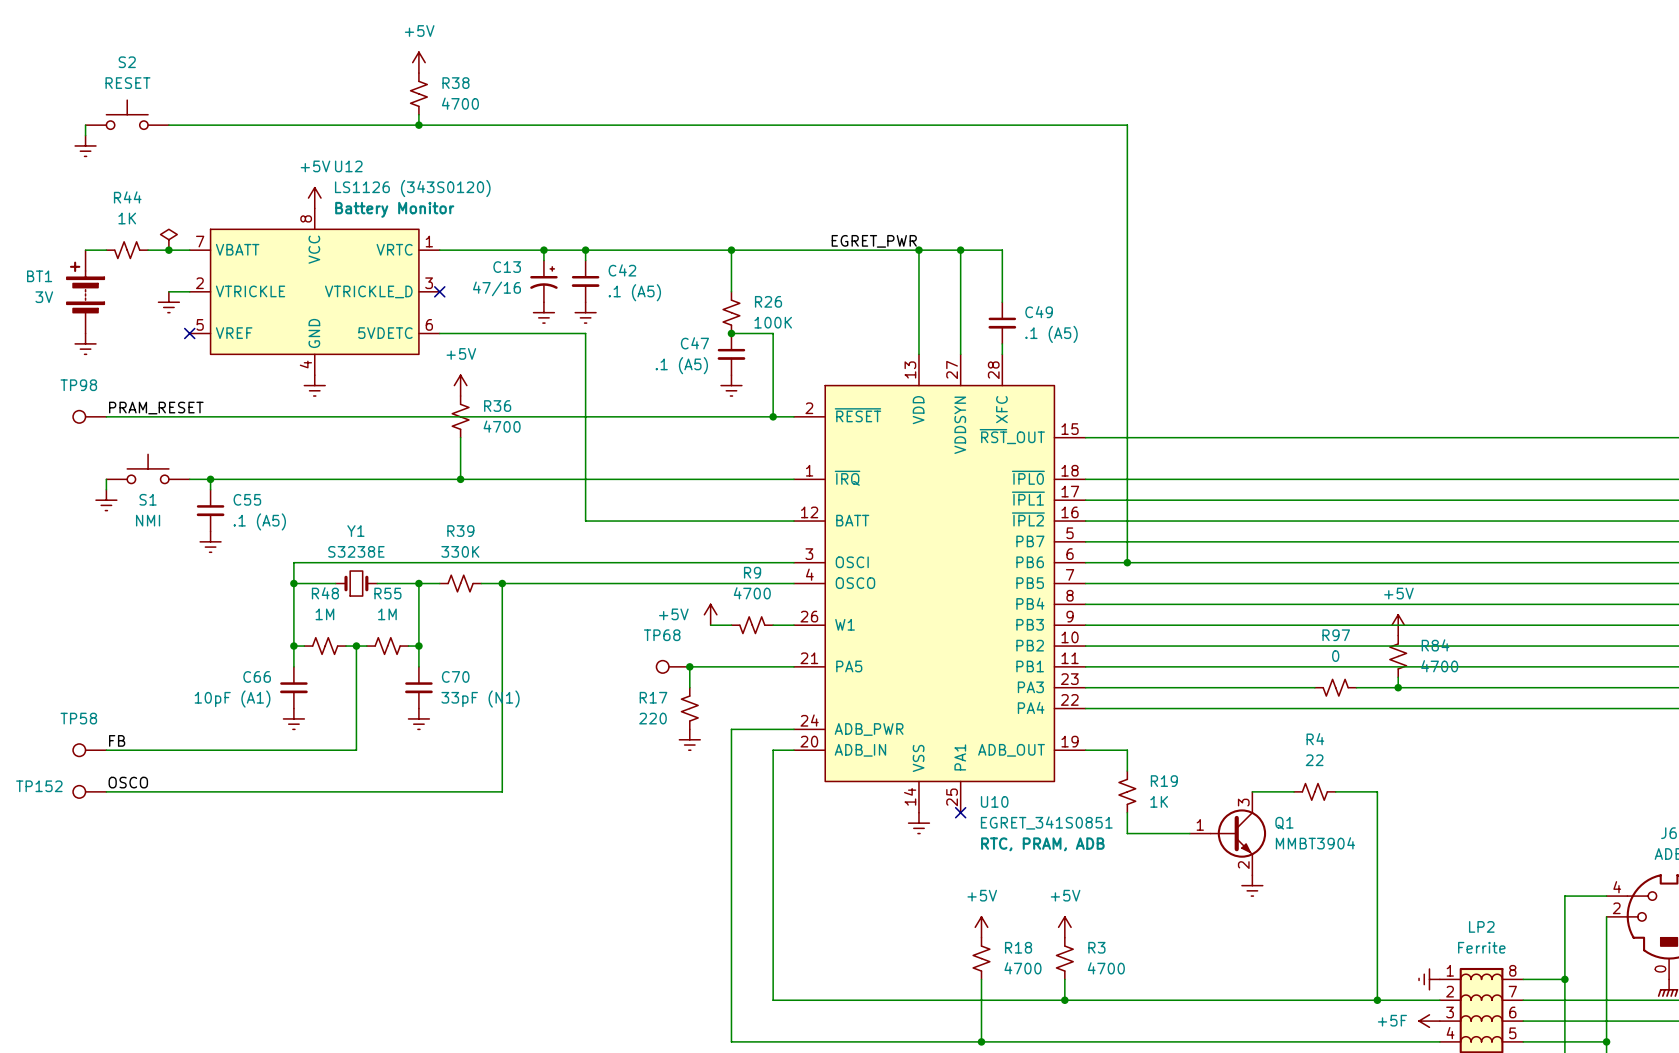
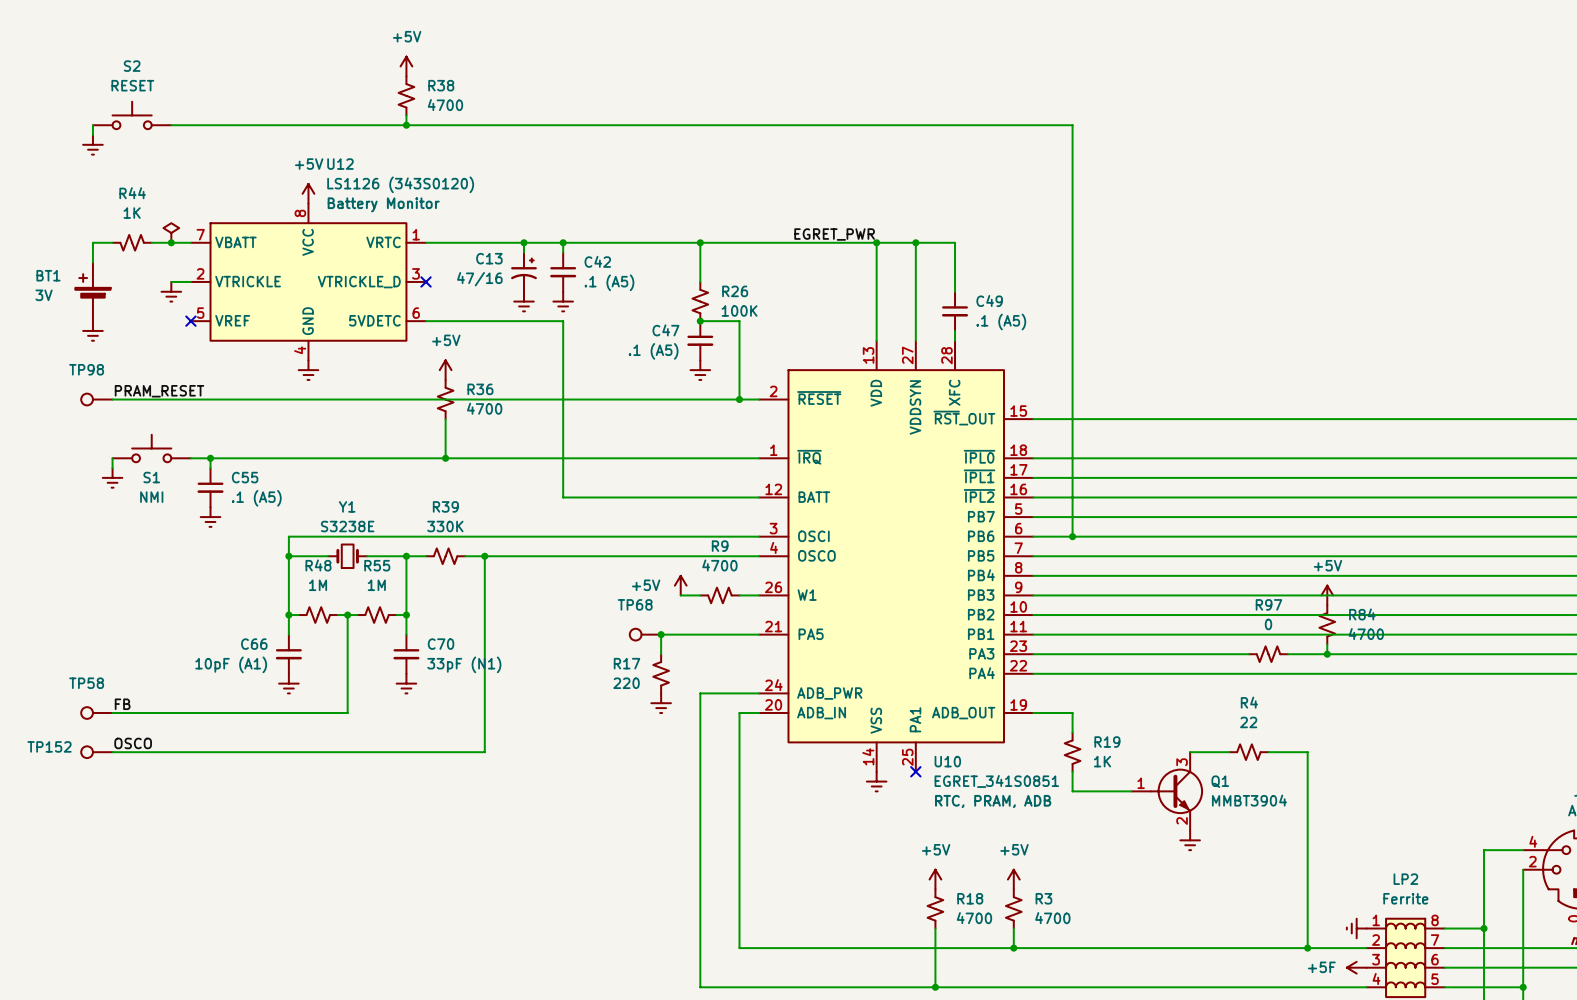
BT1 symbol: [66, 250, 105, 334] -> [75, 262, 111, 322]

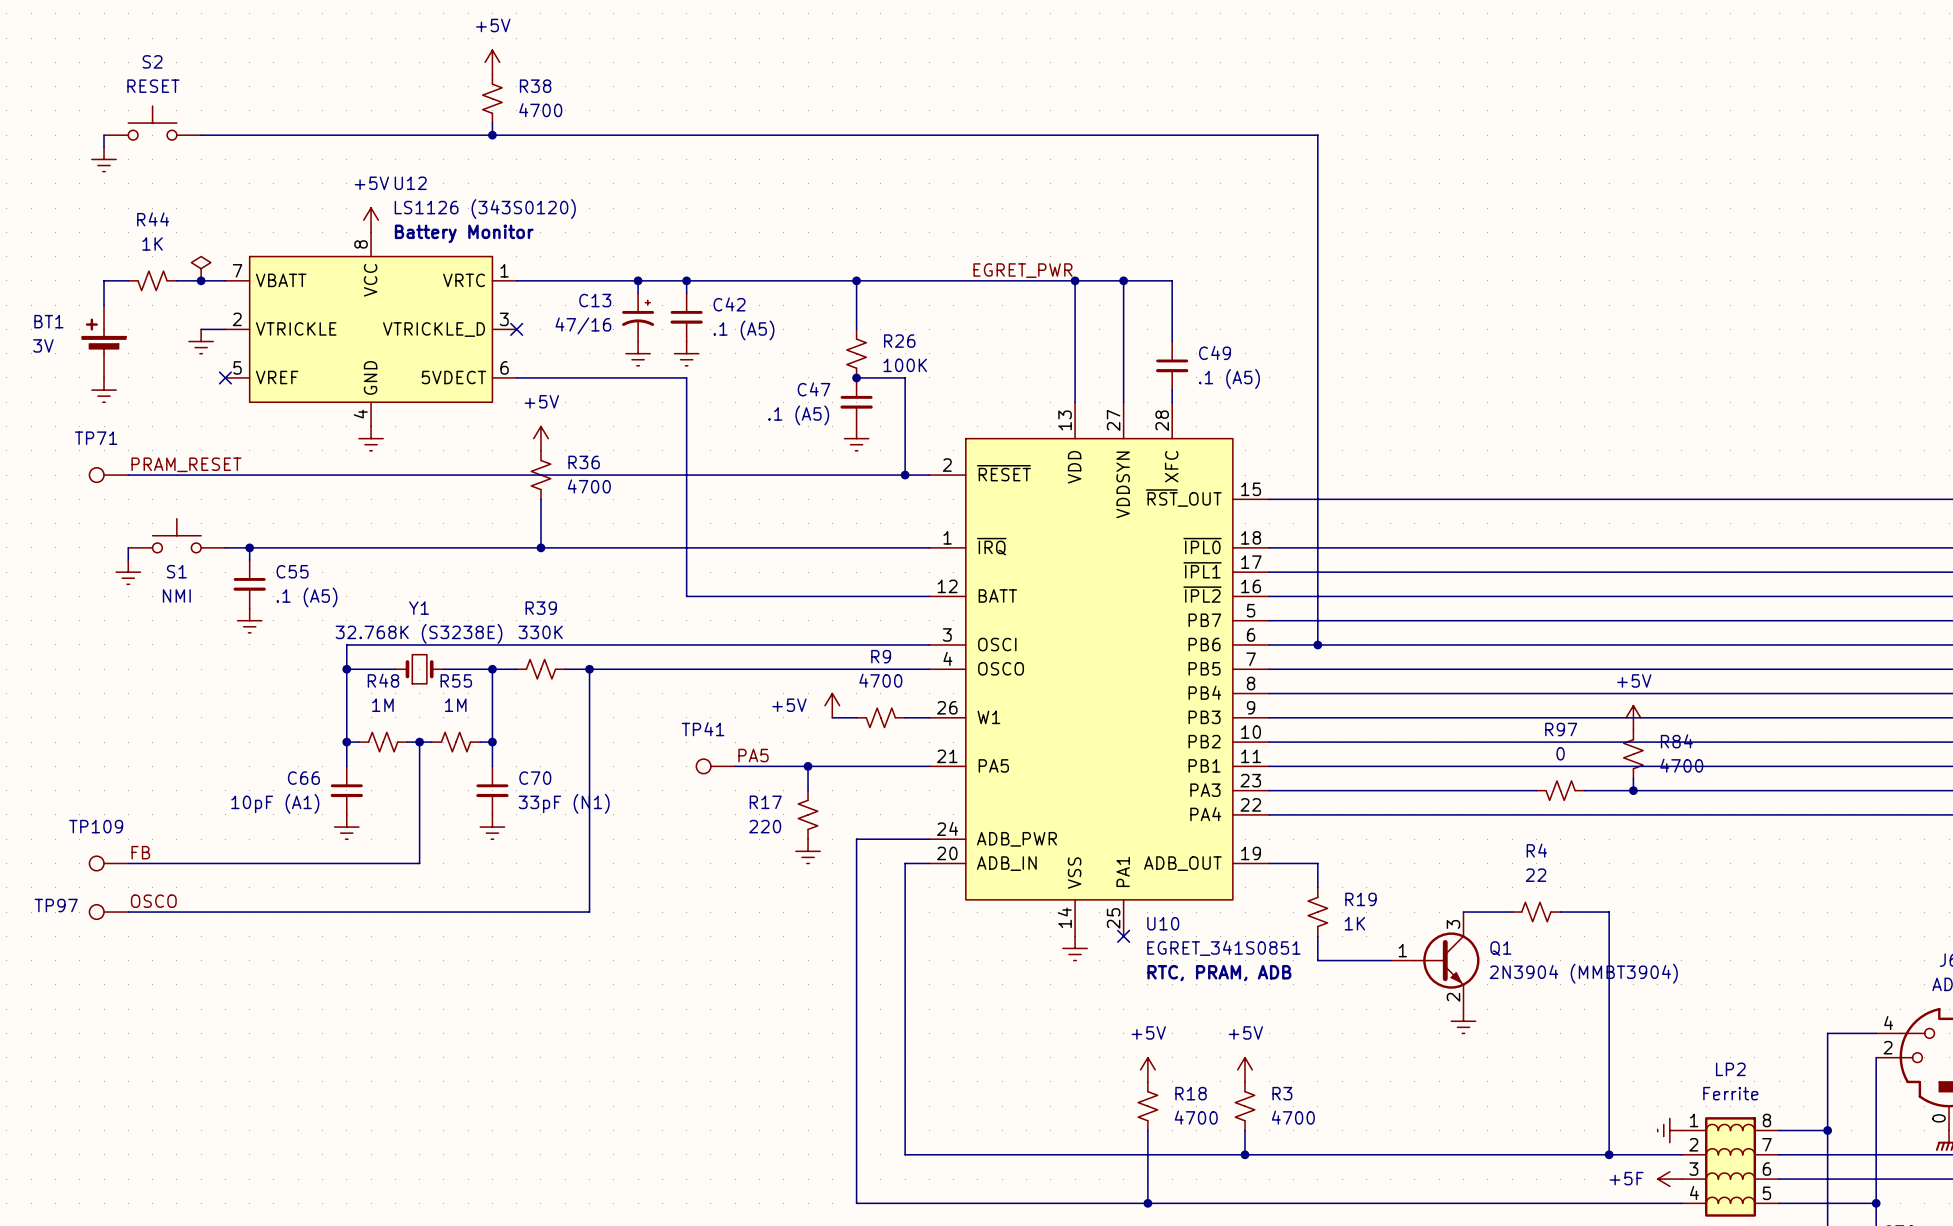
U12 pin name: 5VDETC (374, 320) -> 5VDECT (453, 377)
TP98 name: TP98 (86, 369) -> TP71 (96, 438)
Y1 value: S3238E (347, 526) -> 32.768K (S3238E) (419, 633)
label: none -> PA5 (753, 755)
TP41: none -> (715, 766)
wire: none -> (735, 766) (808, 766)
TP68: (645, 634) -> none
TP58 name: TP58 (86, 683) -> TP109 (96, 826)
TP152 name: TP152 (49, 746) -> TP97 (56, 905)
Q1 value: MMBT3904 (1249, 800) -> 2N3904 (MMBT3904) (1583, 973)

